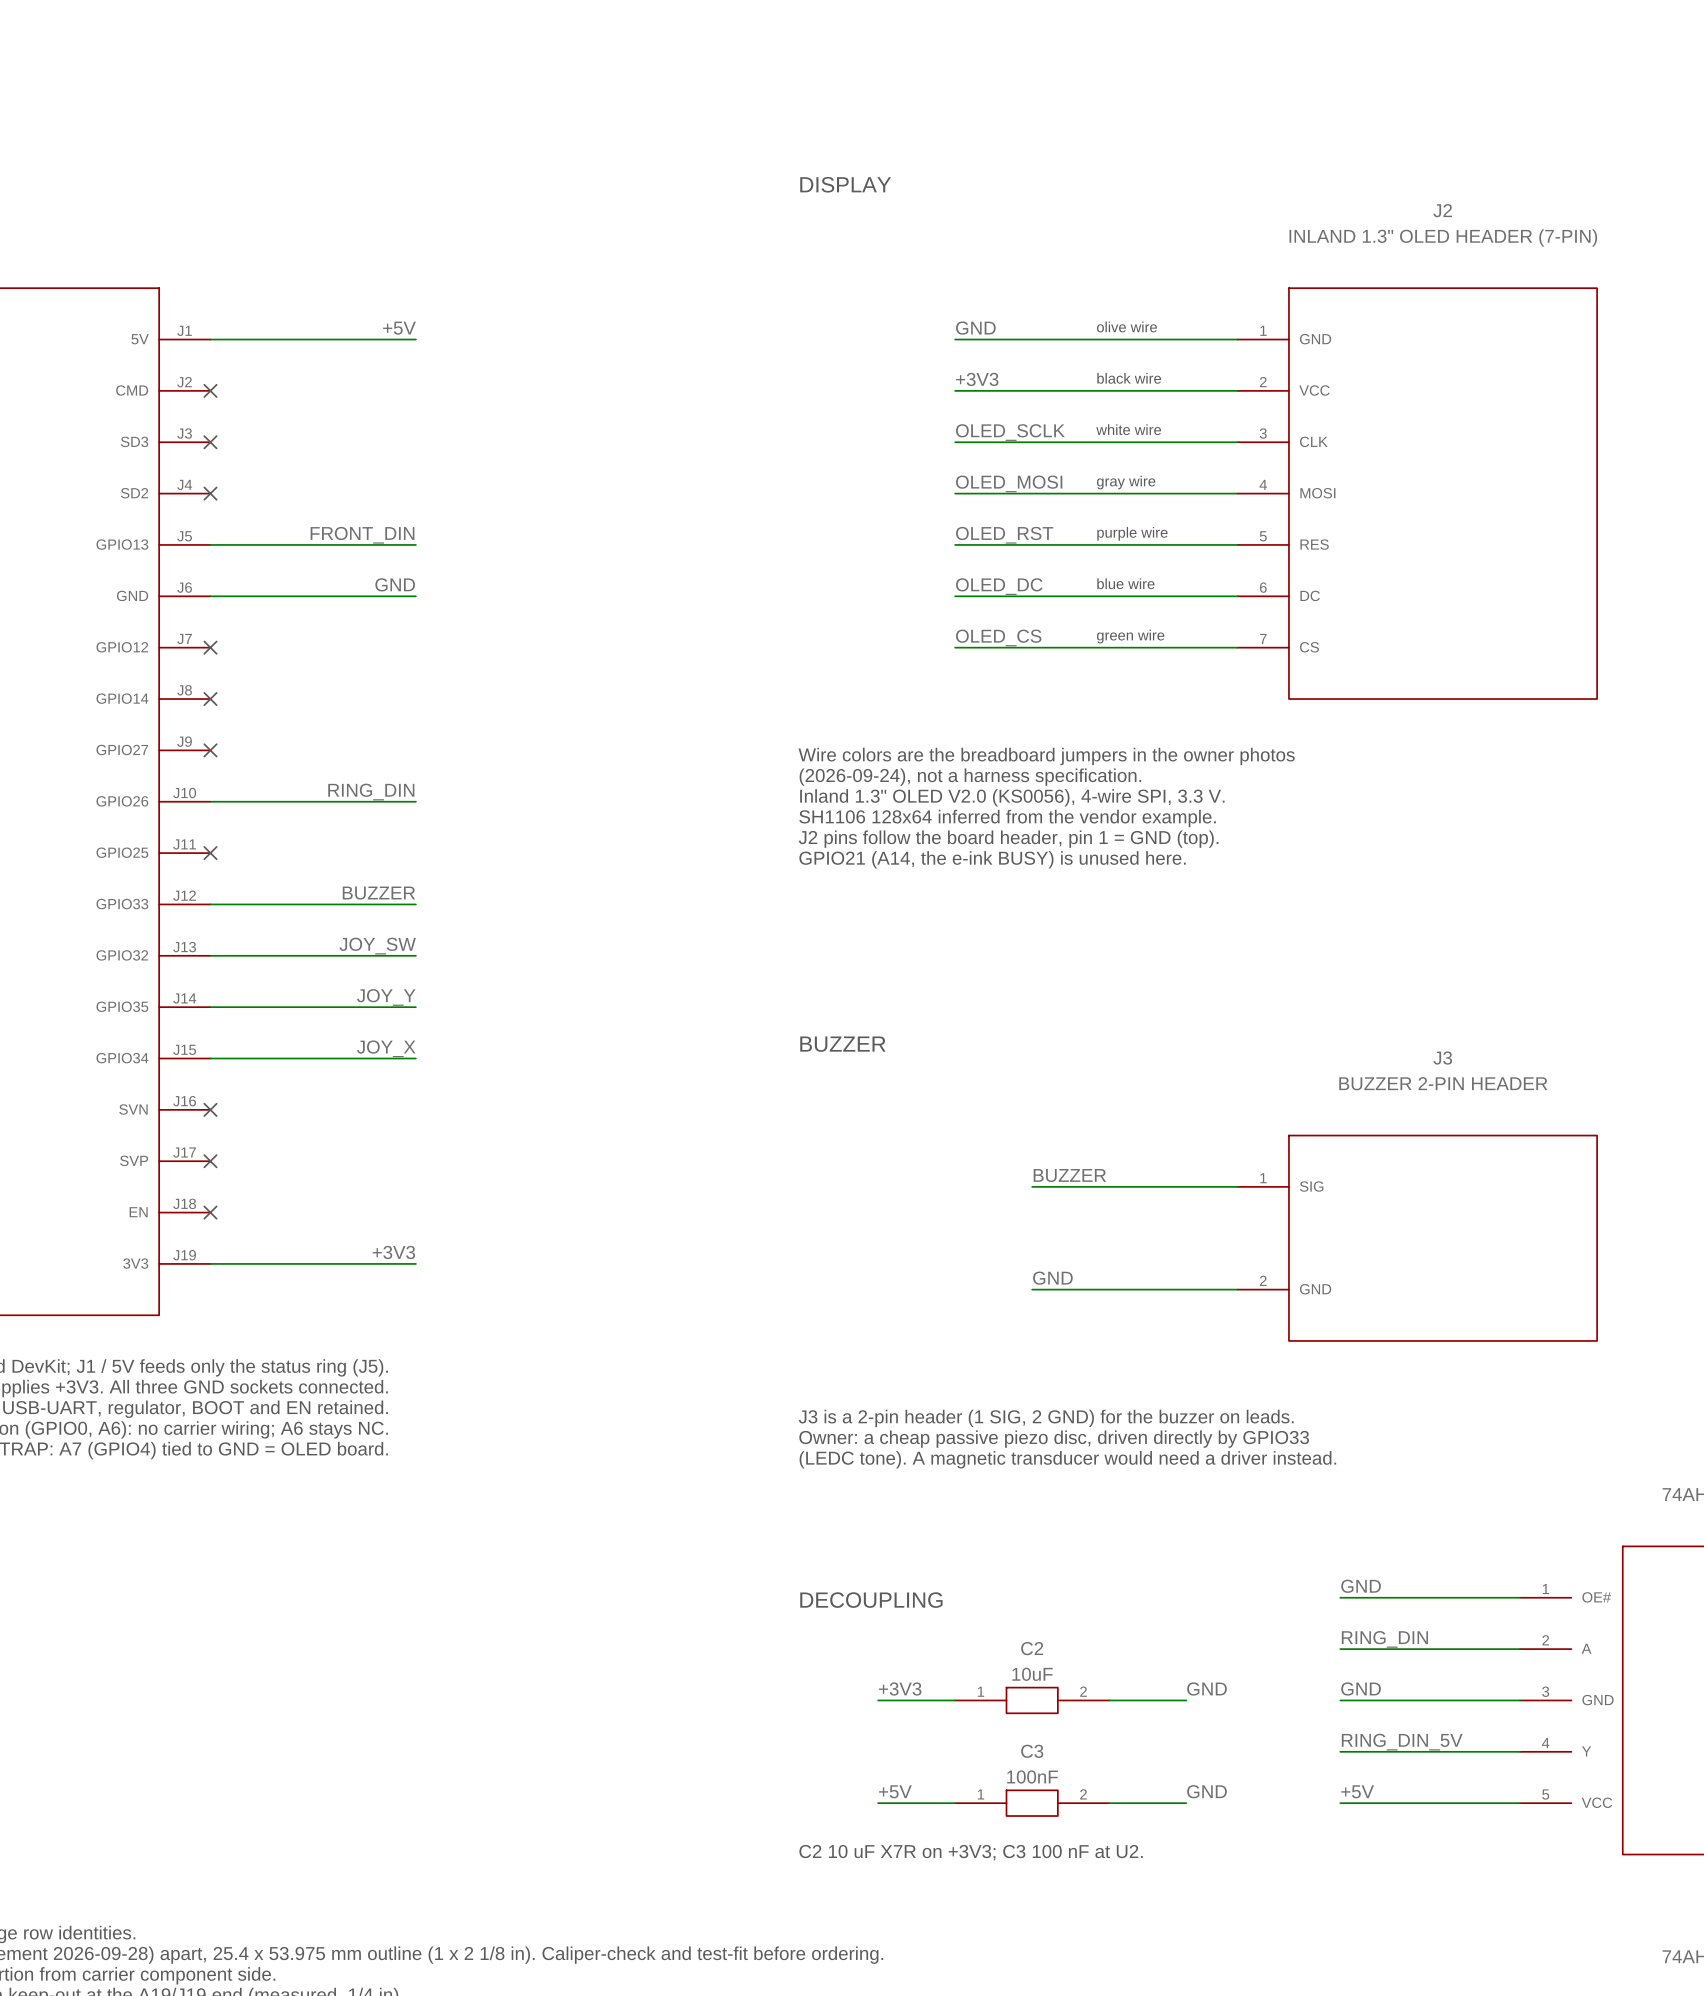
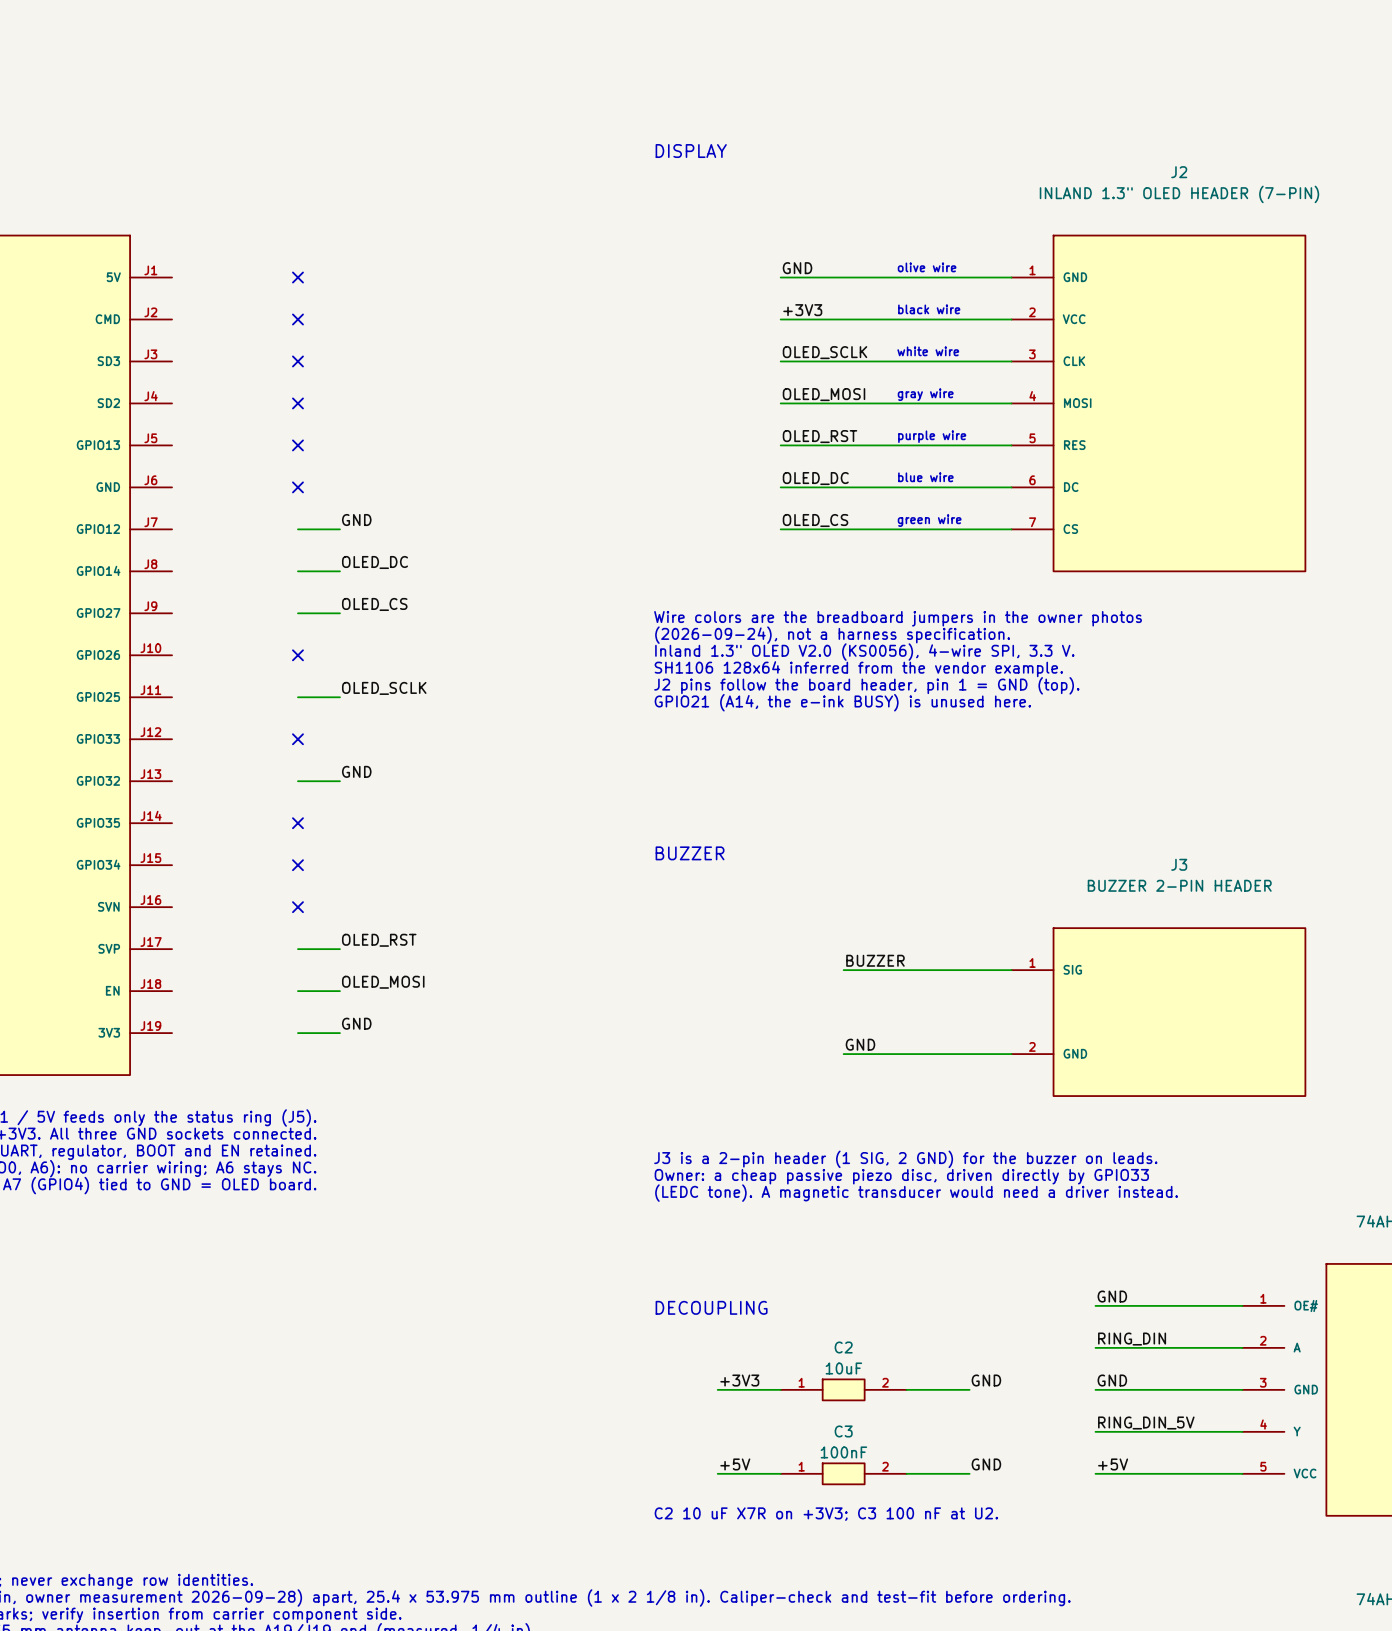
label: +5V (399, 328) -> none
wire: (210, 339) (415, 339) -> none
no-connect mark: none -> (297, 277)
no-connect mark: (210, 390) -> none
no-connect mark: none -> (297, 319)
no-connect mark: (210, 442) -> none
no-connect mark: none -> (297, 361)
no-connect mark: (210, 493) -> none
no-connect mark: none -> (297, 403)
label: FRONT_DIN (362, 535) -> none
wire: (210, 544) (415, 544) -> none
no-connect mark: none -> (297, 445)
label position: GND (395, 584) -> GND (356, 520)
wire: (210, 596) (415, 596) -> none
no-connect mark: none -> (297, 487)
no-connect mark: (210, 647) -> none
wire: none -> (297, 529) (339, 529)
label: none -> OLED_DC (375, 562)
no-connect mark: (210, 699) -> none
wire: none -> (297, 571) (339, 571)
label: none -> OLED_CS (374, 604)
no-connect mark: (210, 750) -> none
wire: none -> (297, 613) (339, 613)
label: RING_DIN (371, 792) -> none
wire: (210, 801) (415, 801) -> none
no-connect mark: none -> (297, 655)
label: none -> OLED_SCLK (384, 688)
no-connect mark: (210, 853) -> none
wire: none -> (297, 697) (339, 697)
label: BUZZER (378, 893) -> none
wire: (210, 904) (415, 904) -> none
no-connect mark: none -> (297, 739)
label: JOY_SW (377, 946) -> GND (356, 771)
wire: (210, 955) (364, 955) -> none
label: JOY_Y (386, 997) -> none
wire: (210, 1007) (415, 1007) -> none
no-connect mark: none -> (297, 823)
label: JOY_X (386, 1048) -> none
wire: (210, 1058) (415, 1058) -> none
no-connect mark: none -> (297, 865)
no-connect mark: (210, 1109) -> none
no-connect mark: none -> (297, 907)
label: none -> OLED_RST (379, 940)
no-connect mark: (210, 1161) -> none
wire: none -> (297, 949) (339, 949)
label: none -> OLED_MOSI (383, 982)
no-connect mark: (210, 1212) -> none
wire: none -> (297, 991) (339, 991)
label: +3V3 (393, 1252) -> GND (356, 1023)
wire: (210, 1263) (364, 1263) -> none

